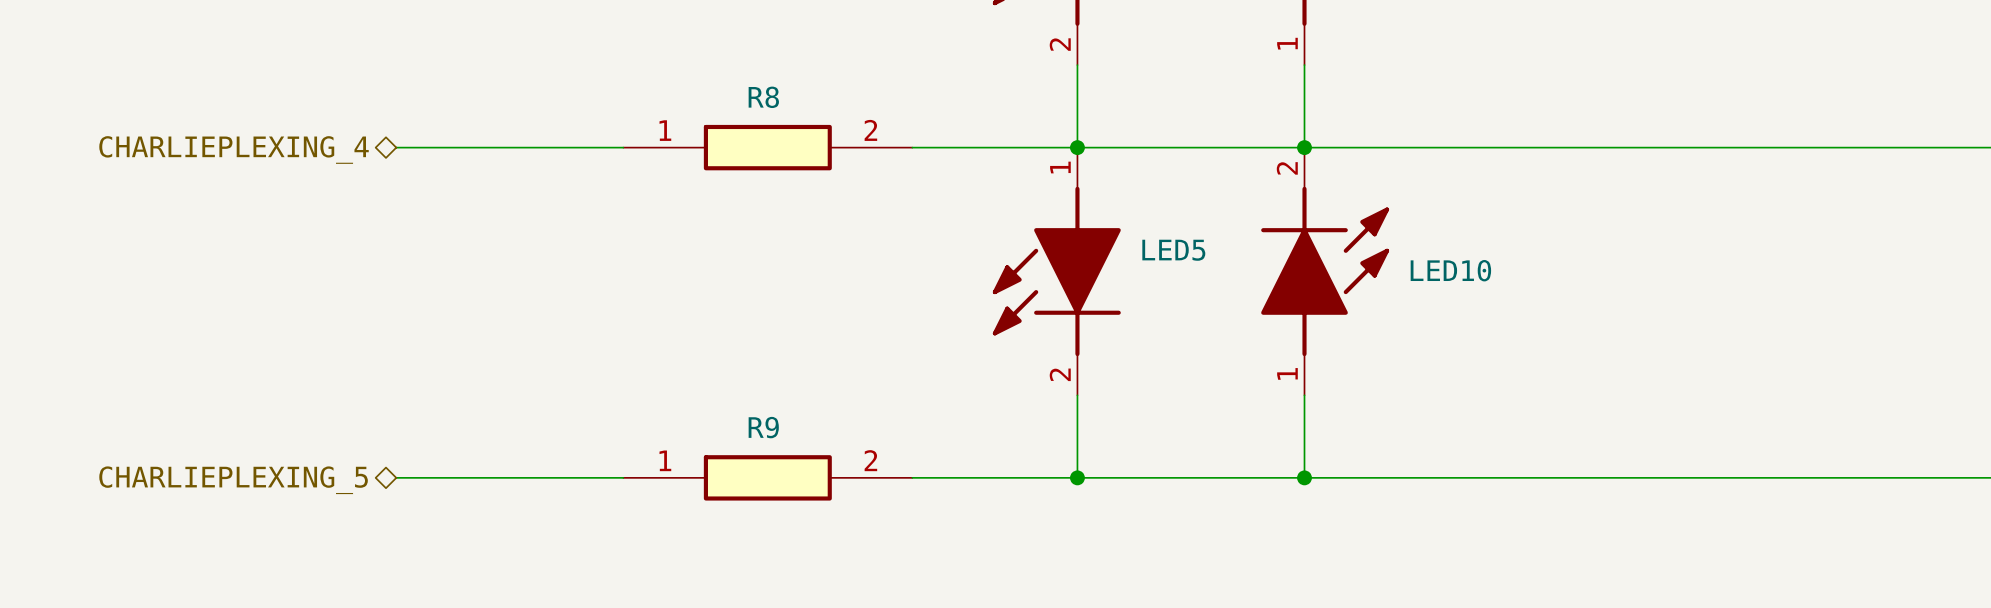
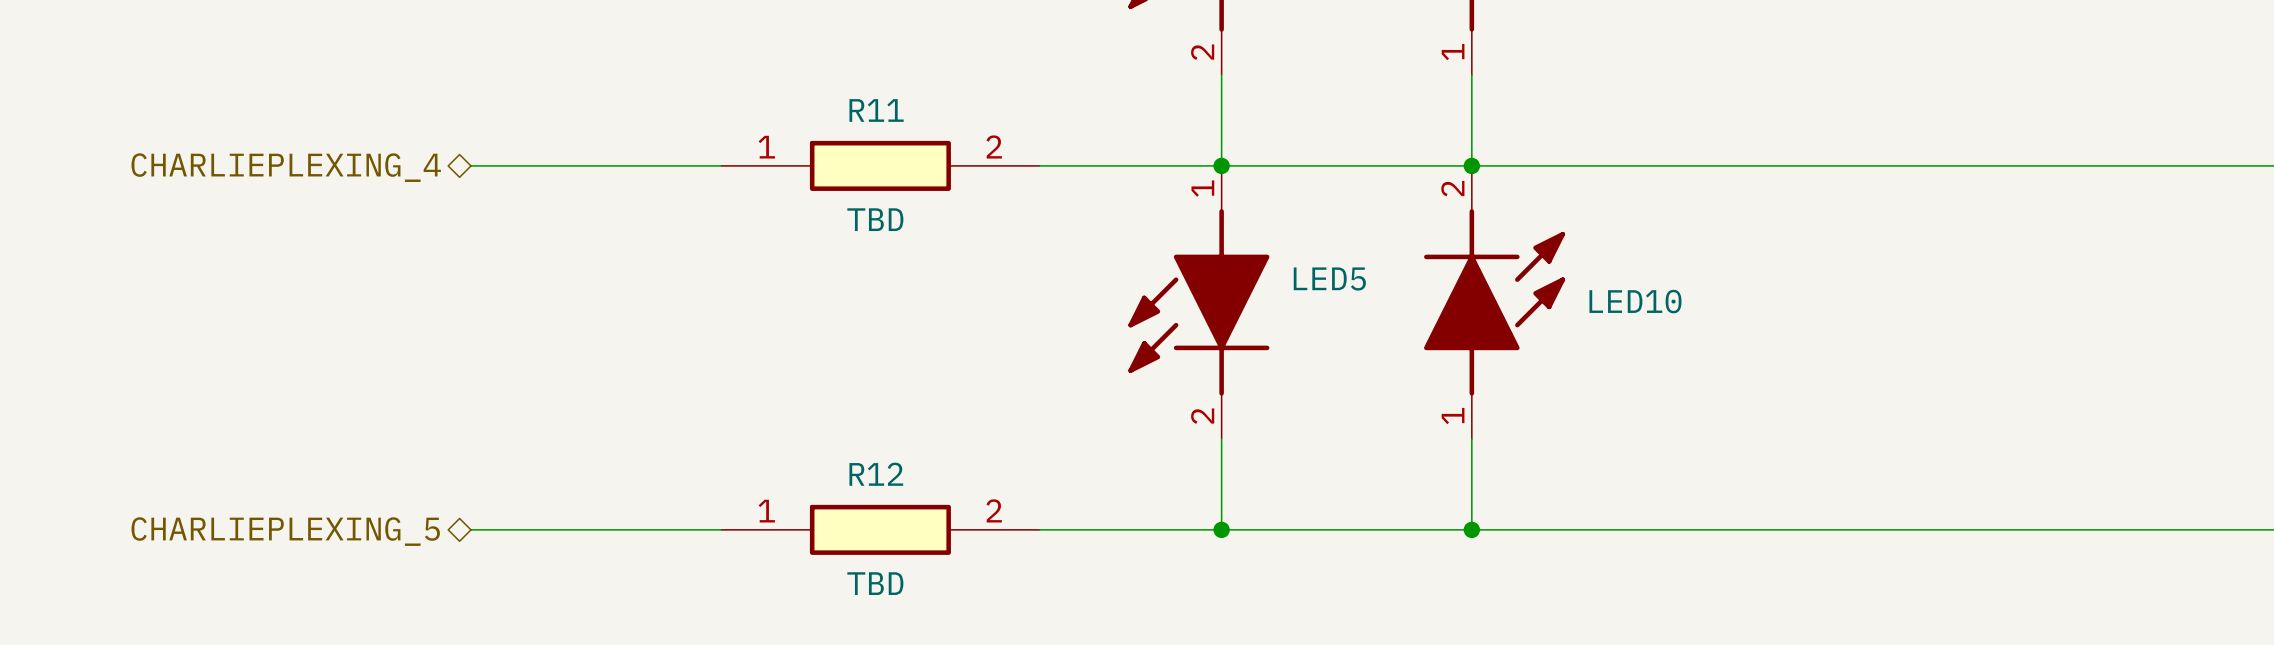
R8 name: R8 (763, 97) -> R11 (876, 110)
R8 value: none -> TBD (875, 219)
R9 name: R9 (763, 427) -> R12 (876, 474)
R9 value: none -> TBD (875, 583)

